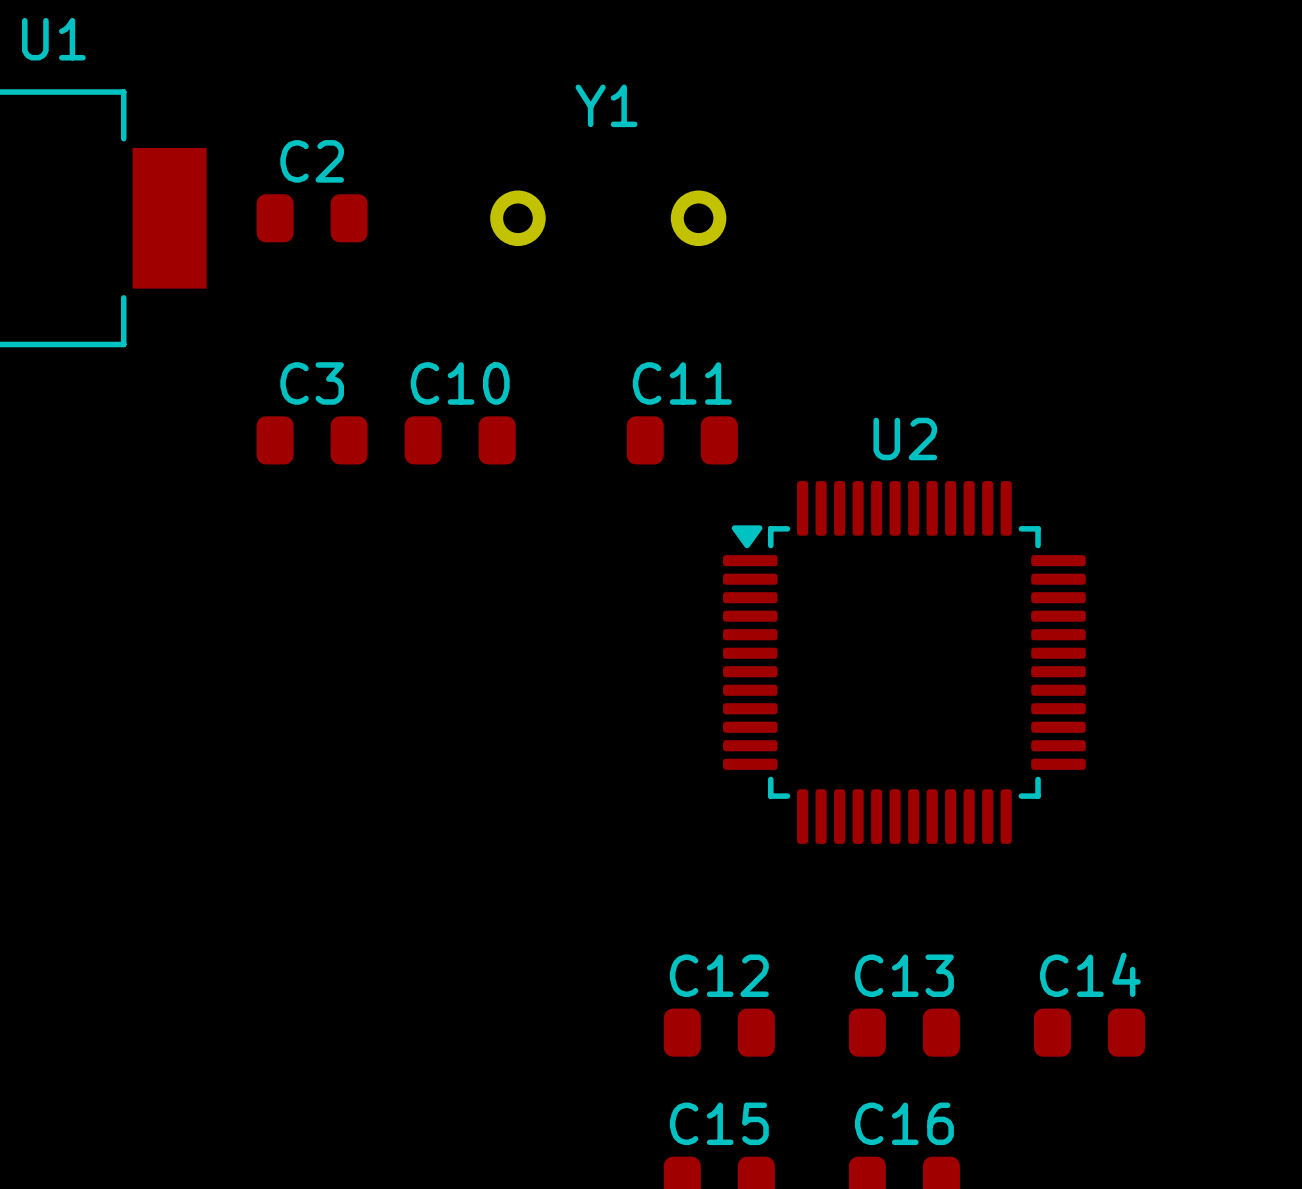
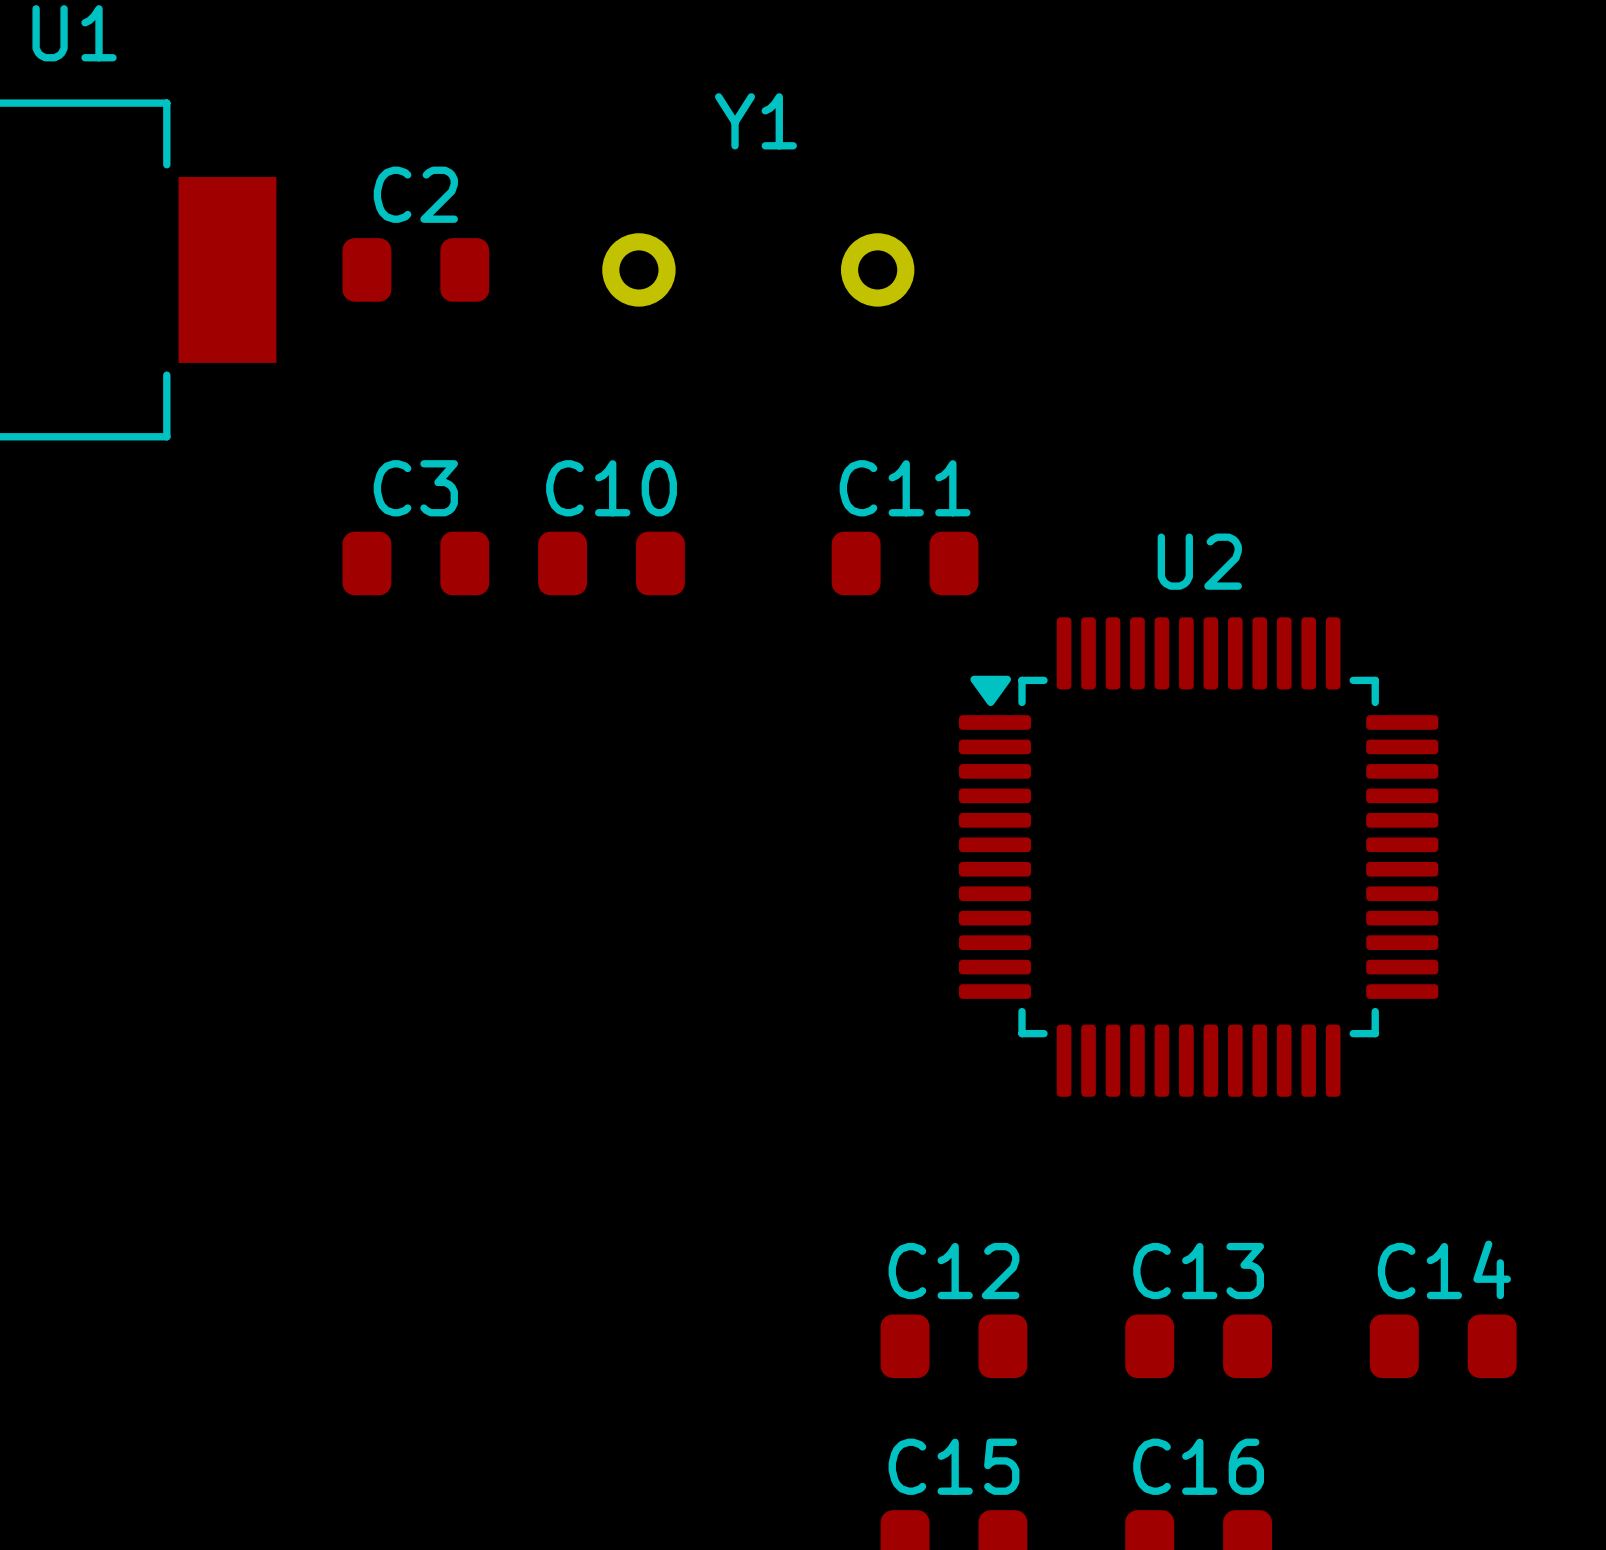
Y1 position: (608, 218) -> (758, 269)

